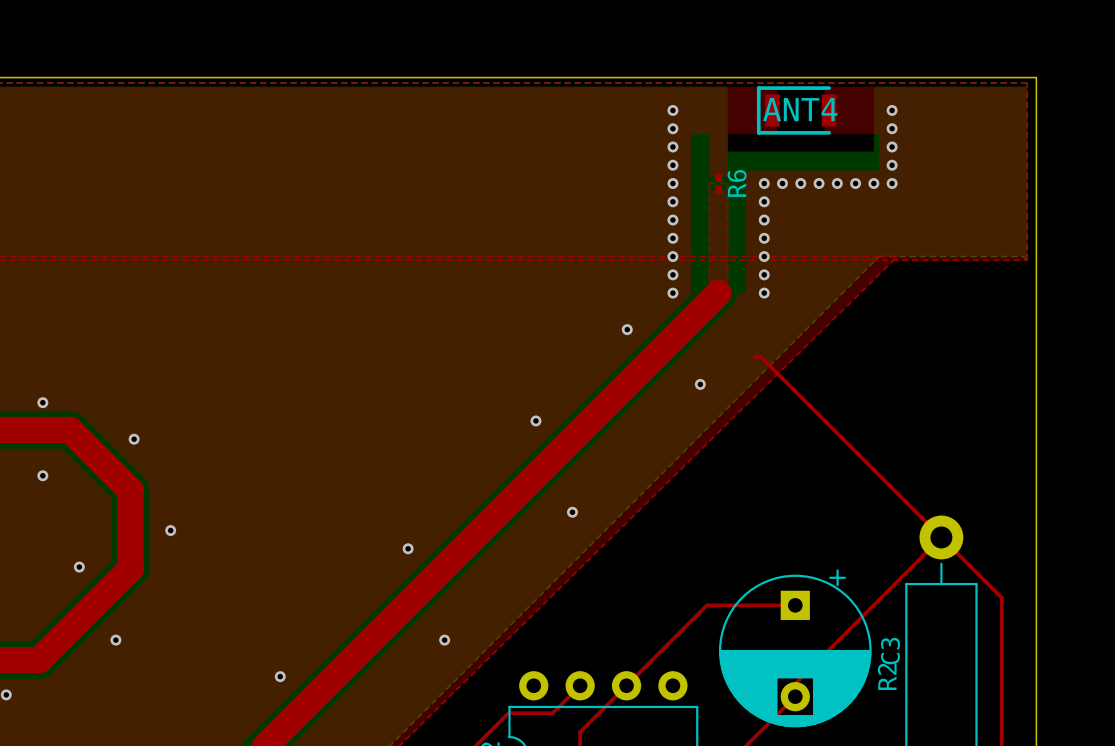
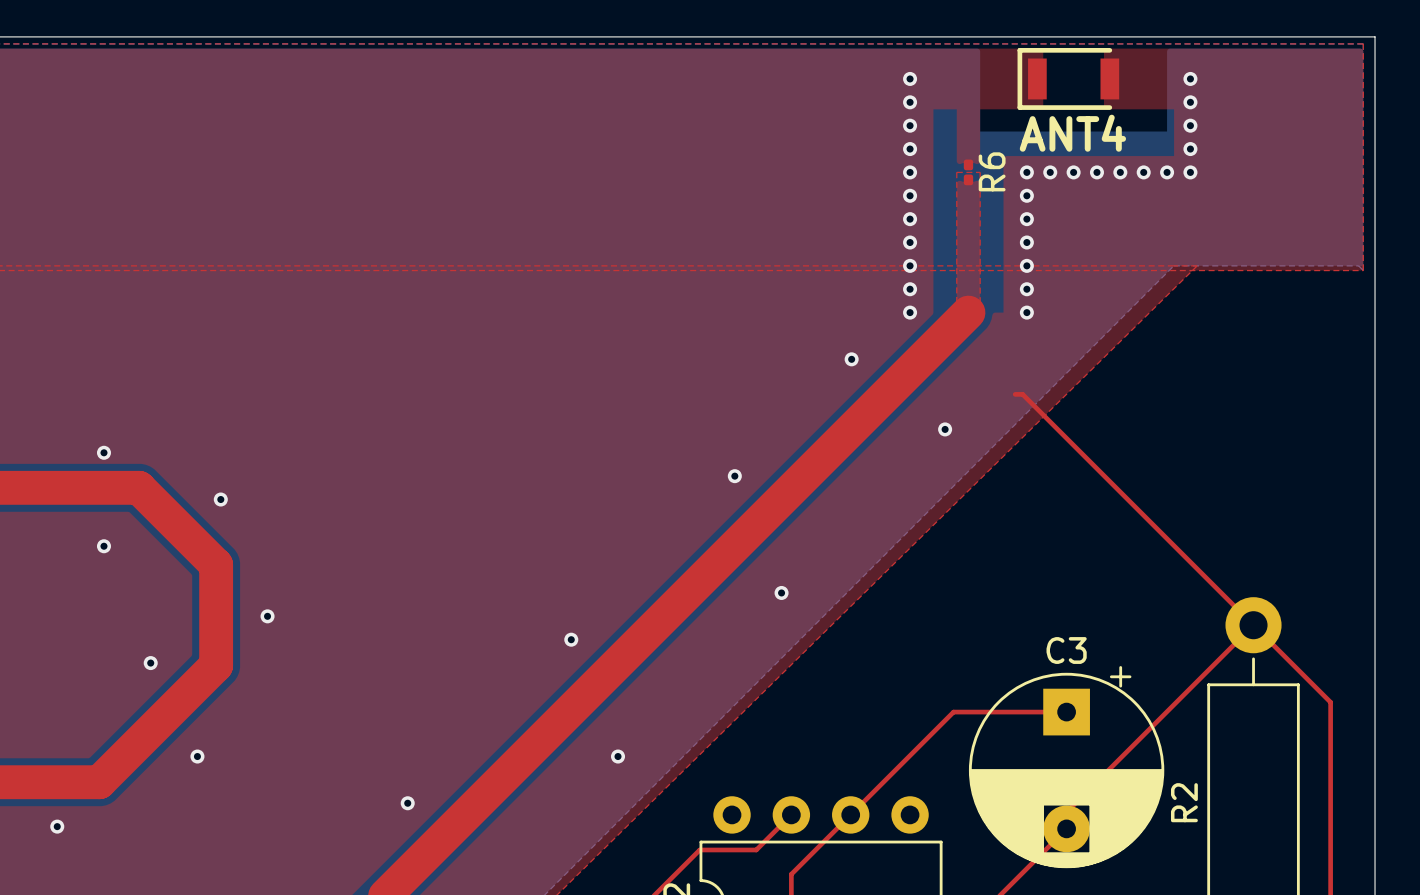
ANT4 name position: ANT4 (800, 109) -> ANT4 (1072, 133)
C3 footprint: [718, 569, 872, 728] -> [968, 666, 1165, 869]
C3 name rotation: 0° (890, 651) -> 90° clockwise (1066, 650)
C3 name position: C3 (890, 651) -> C3 (1066, 650)

